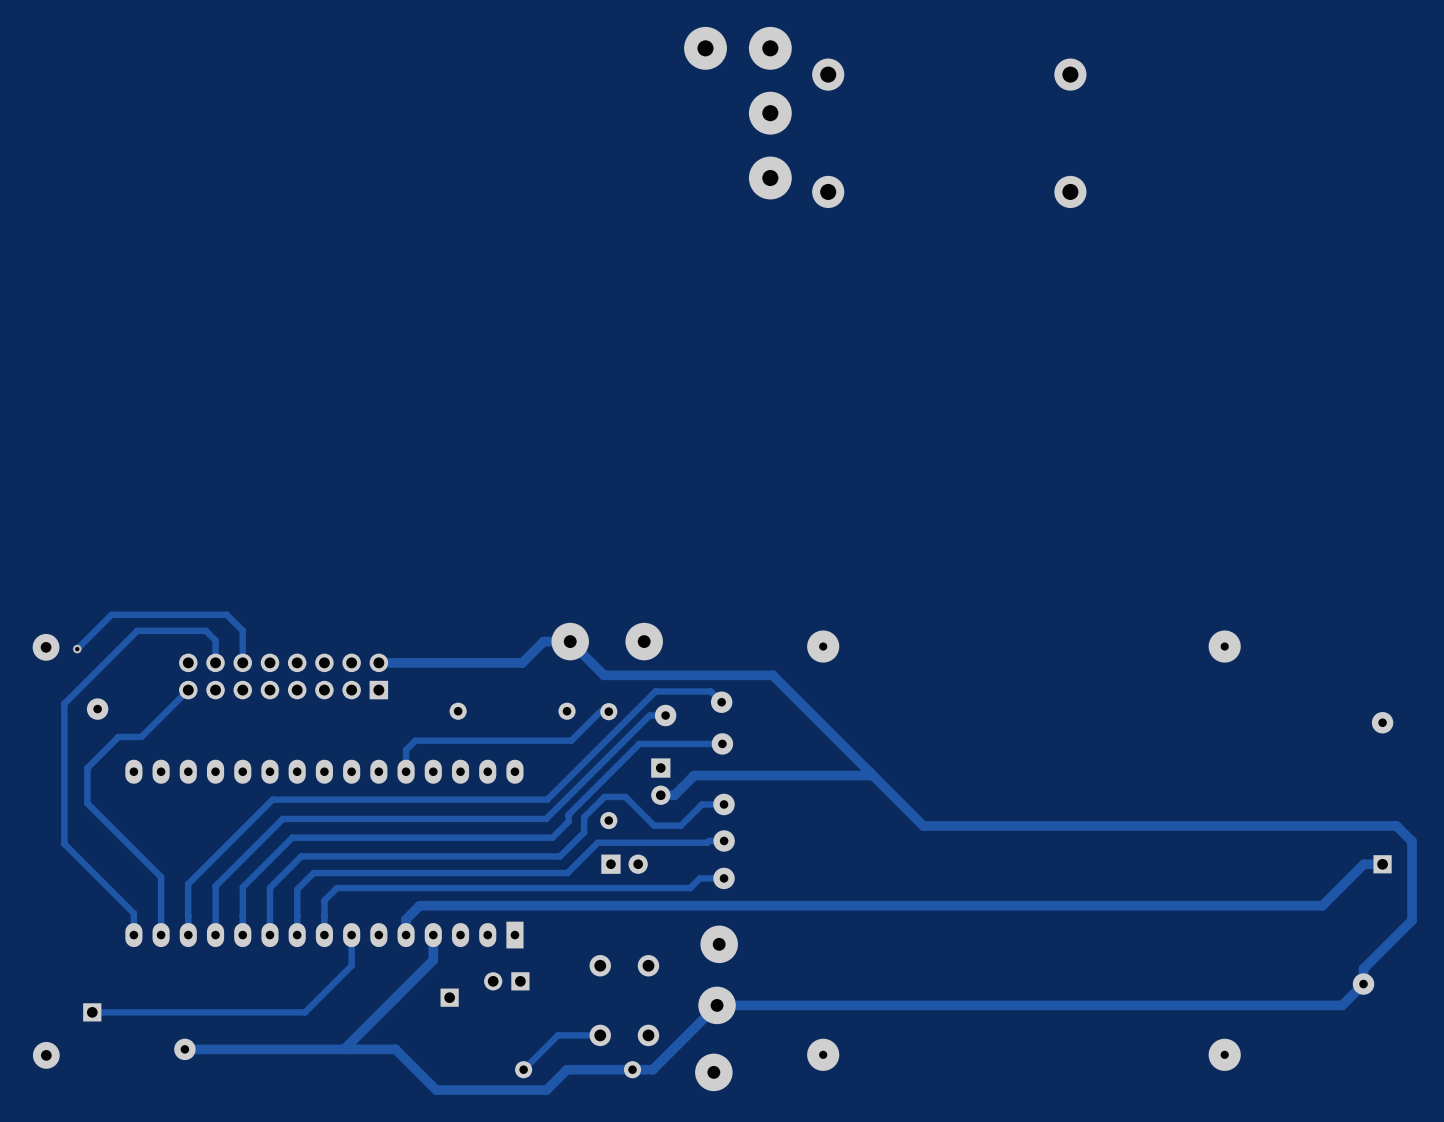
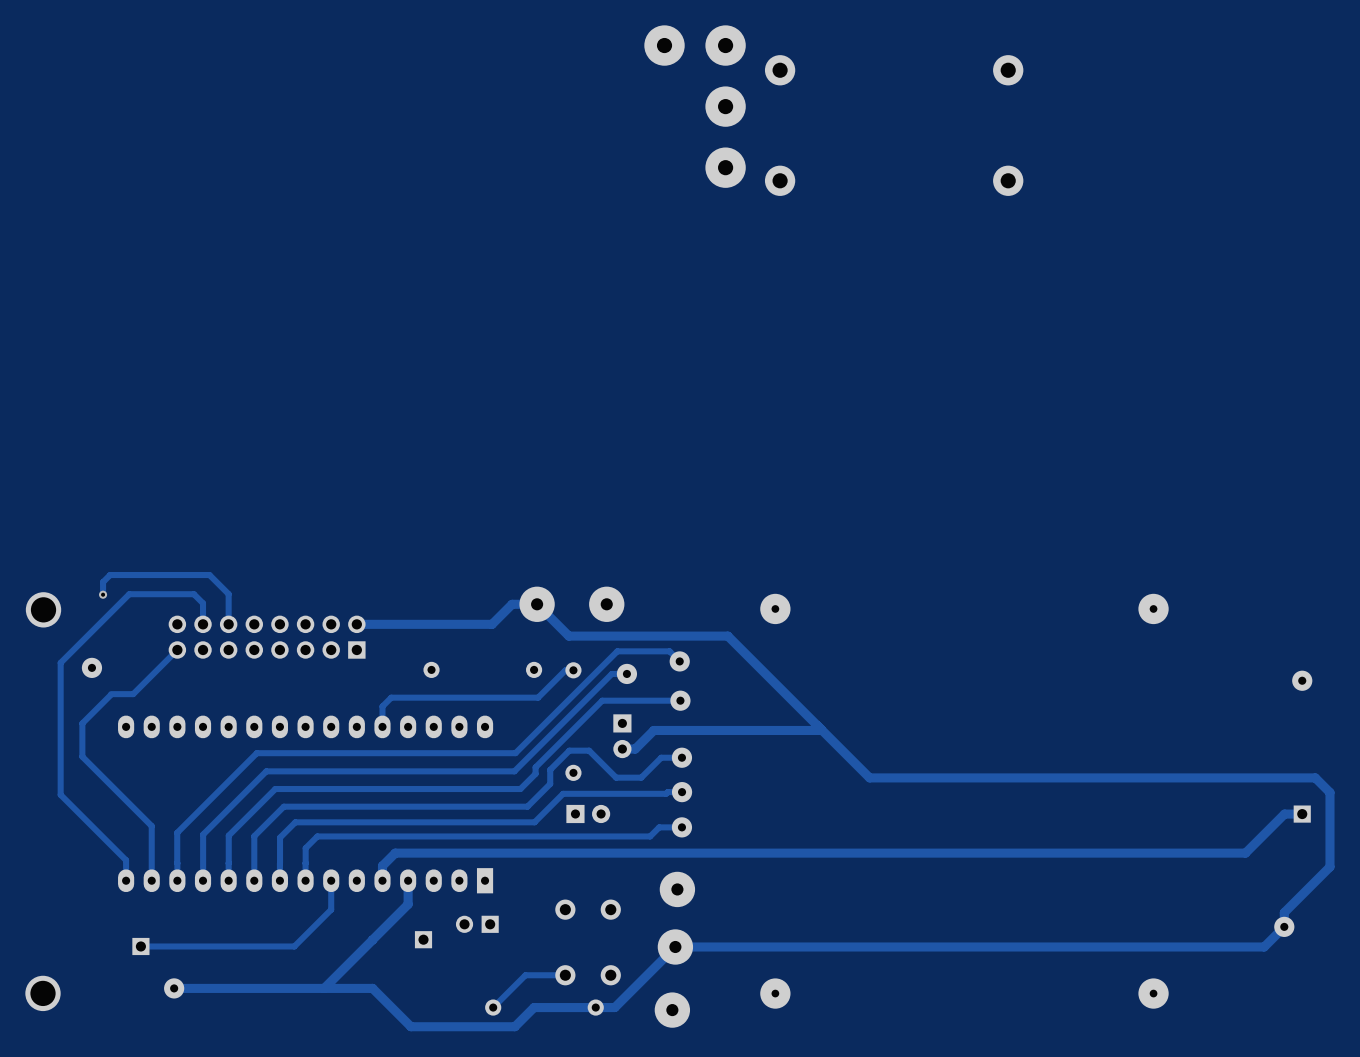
track: (226, 614) (111, 614) (77, 649) -> (213, 579) (209, 575) (110, 575) (103, 582) (103, 594)
part footprint: [32, 633, 60, 661] -> [25, 592, 62, 628]
via position: (77, 649) -> (103, 594)
track: (312, 1004) (305, 1012) (92, 1012) -> (294, 946) (140, 946)
part position: (92, 1012) -> (140, 946)
part footprint: [32, 1041, 60, 1069] -> [25, 975, 61, 1012]

